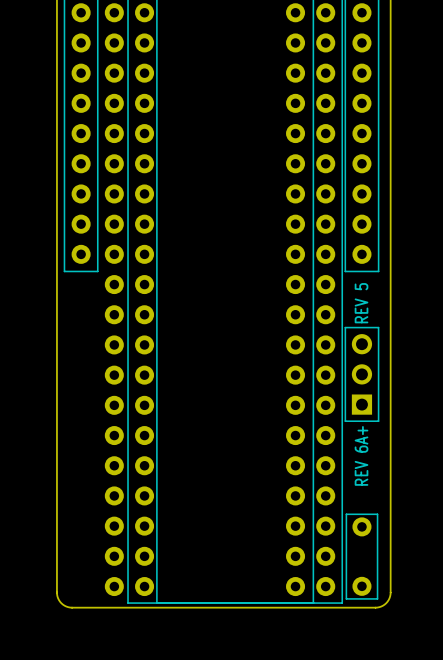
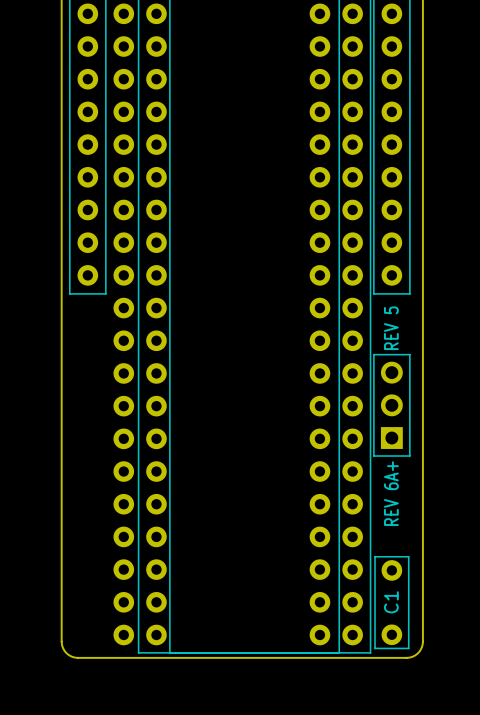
C1 name: none -> C1 (391, 602)

